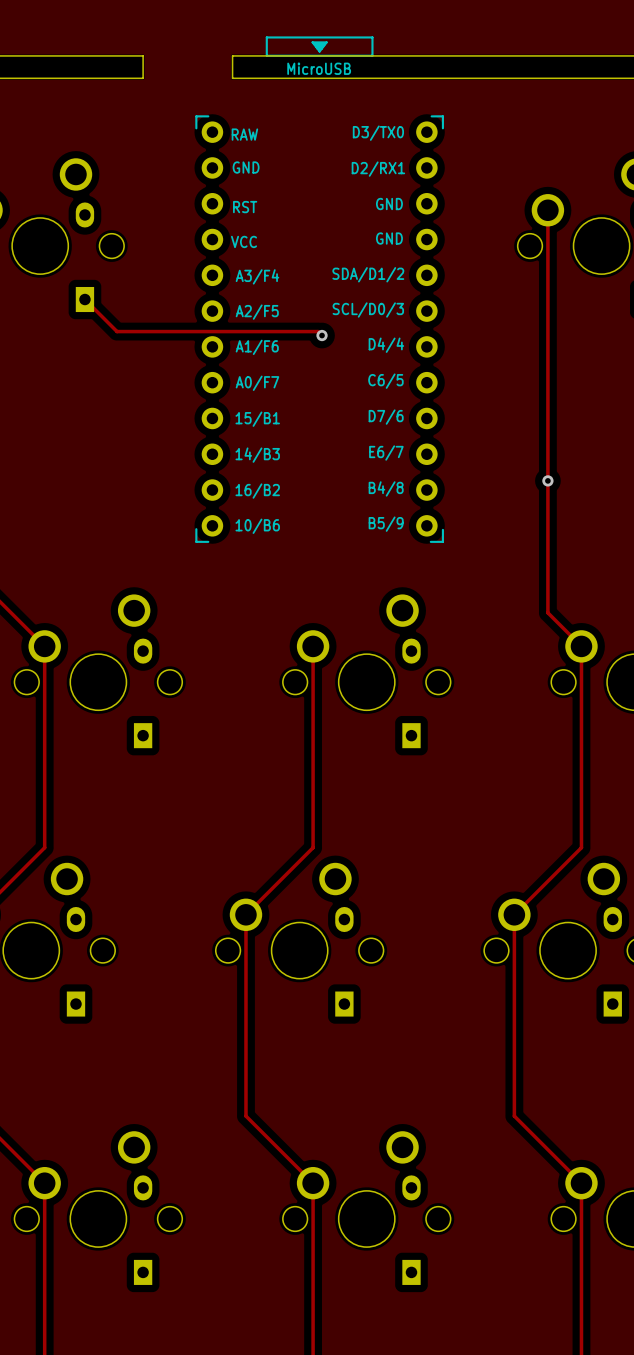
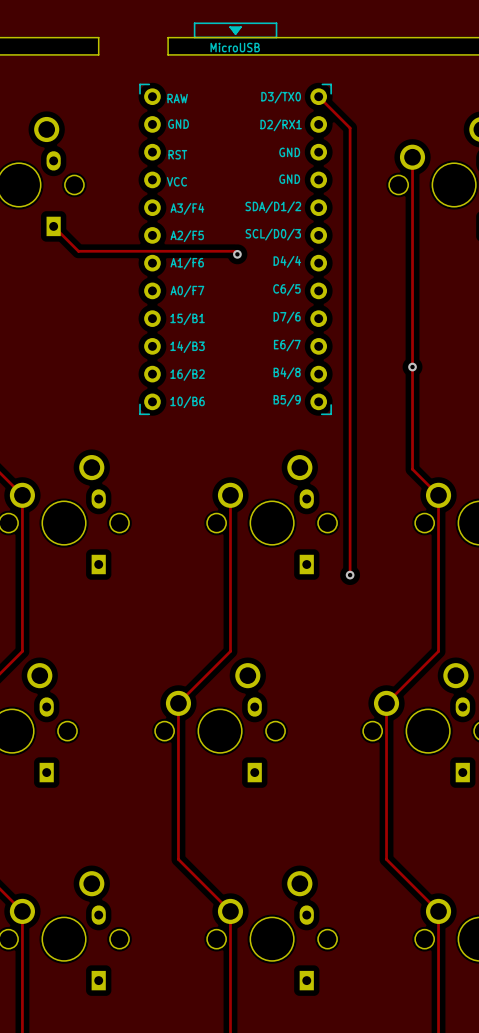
track: none -> (318, 96) (350, 128) (350, 575)
via: none -> (350, 575)

